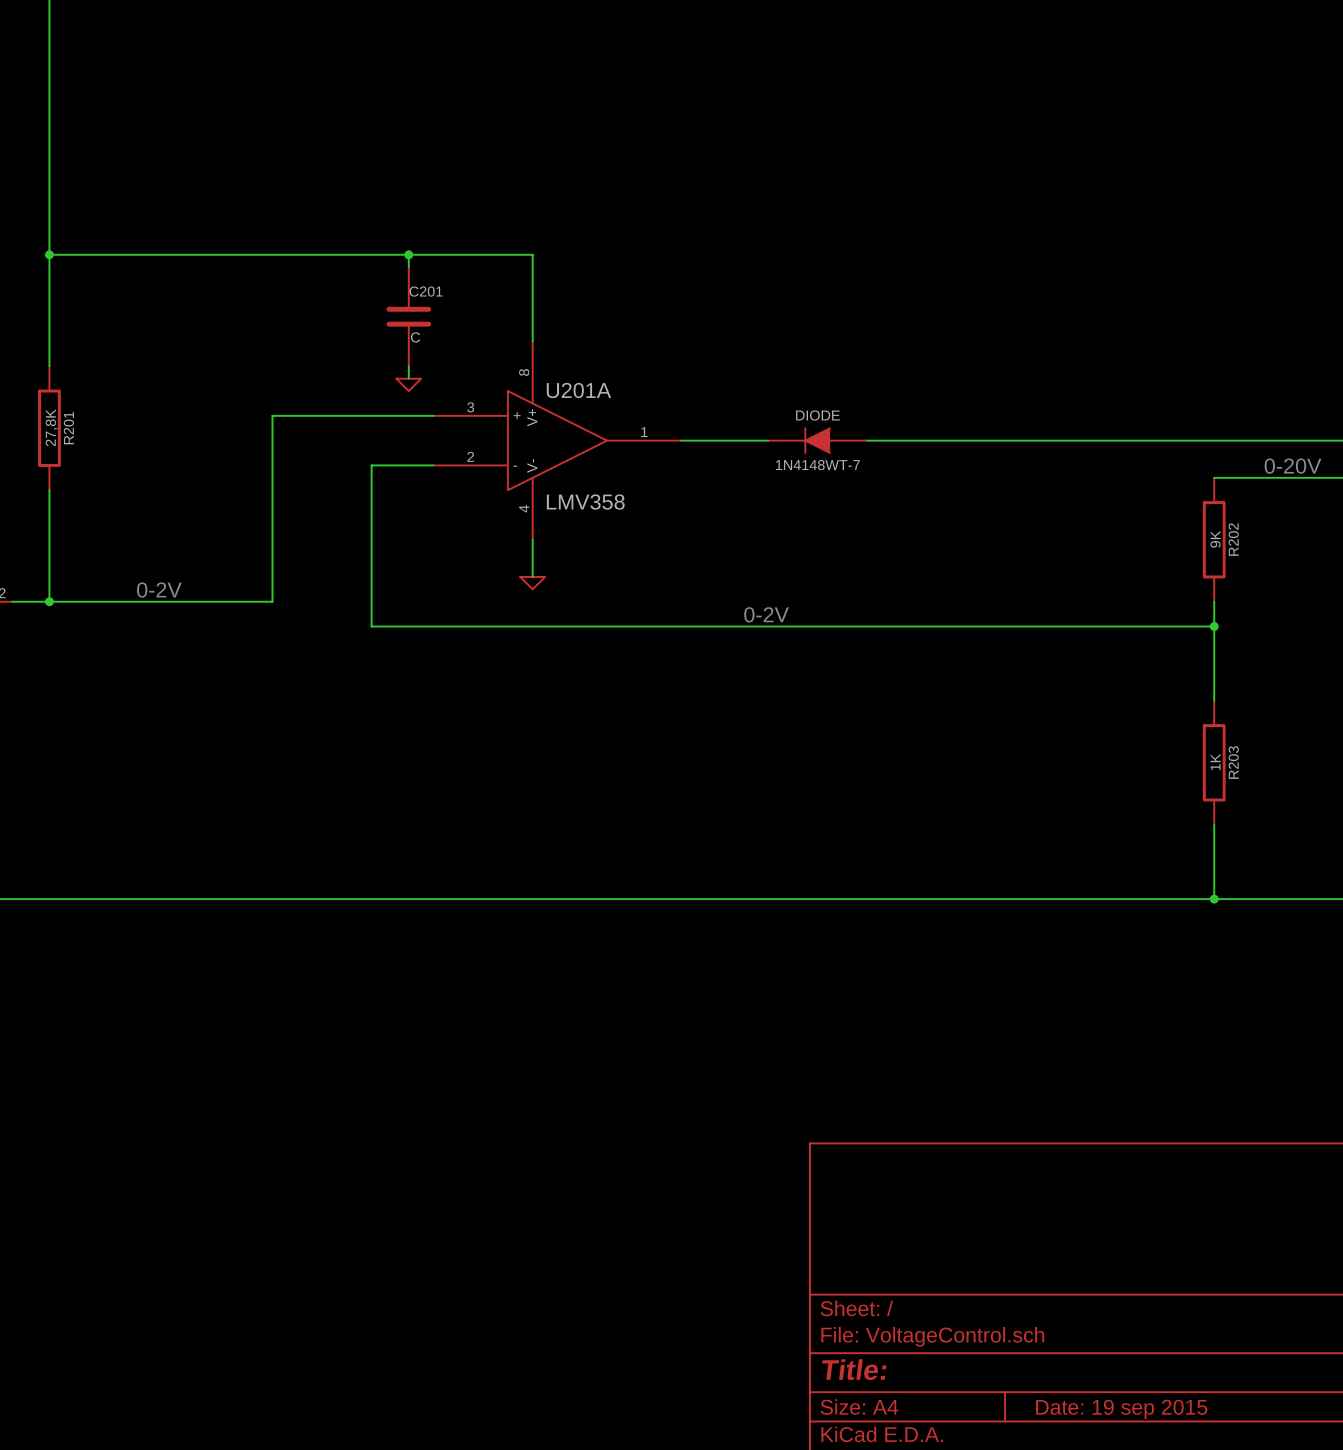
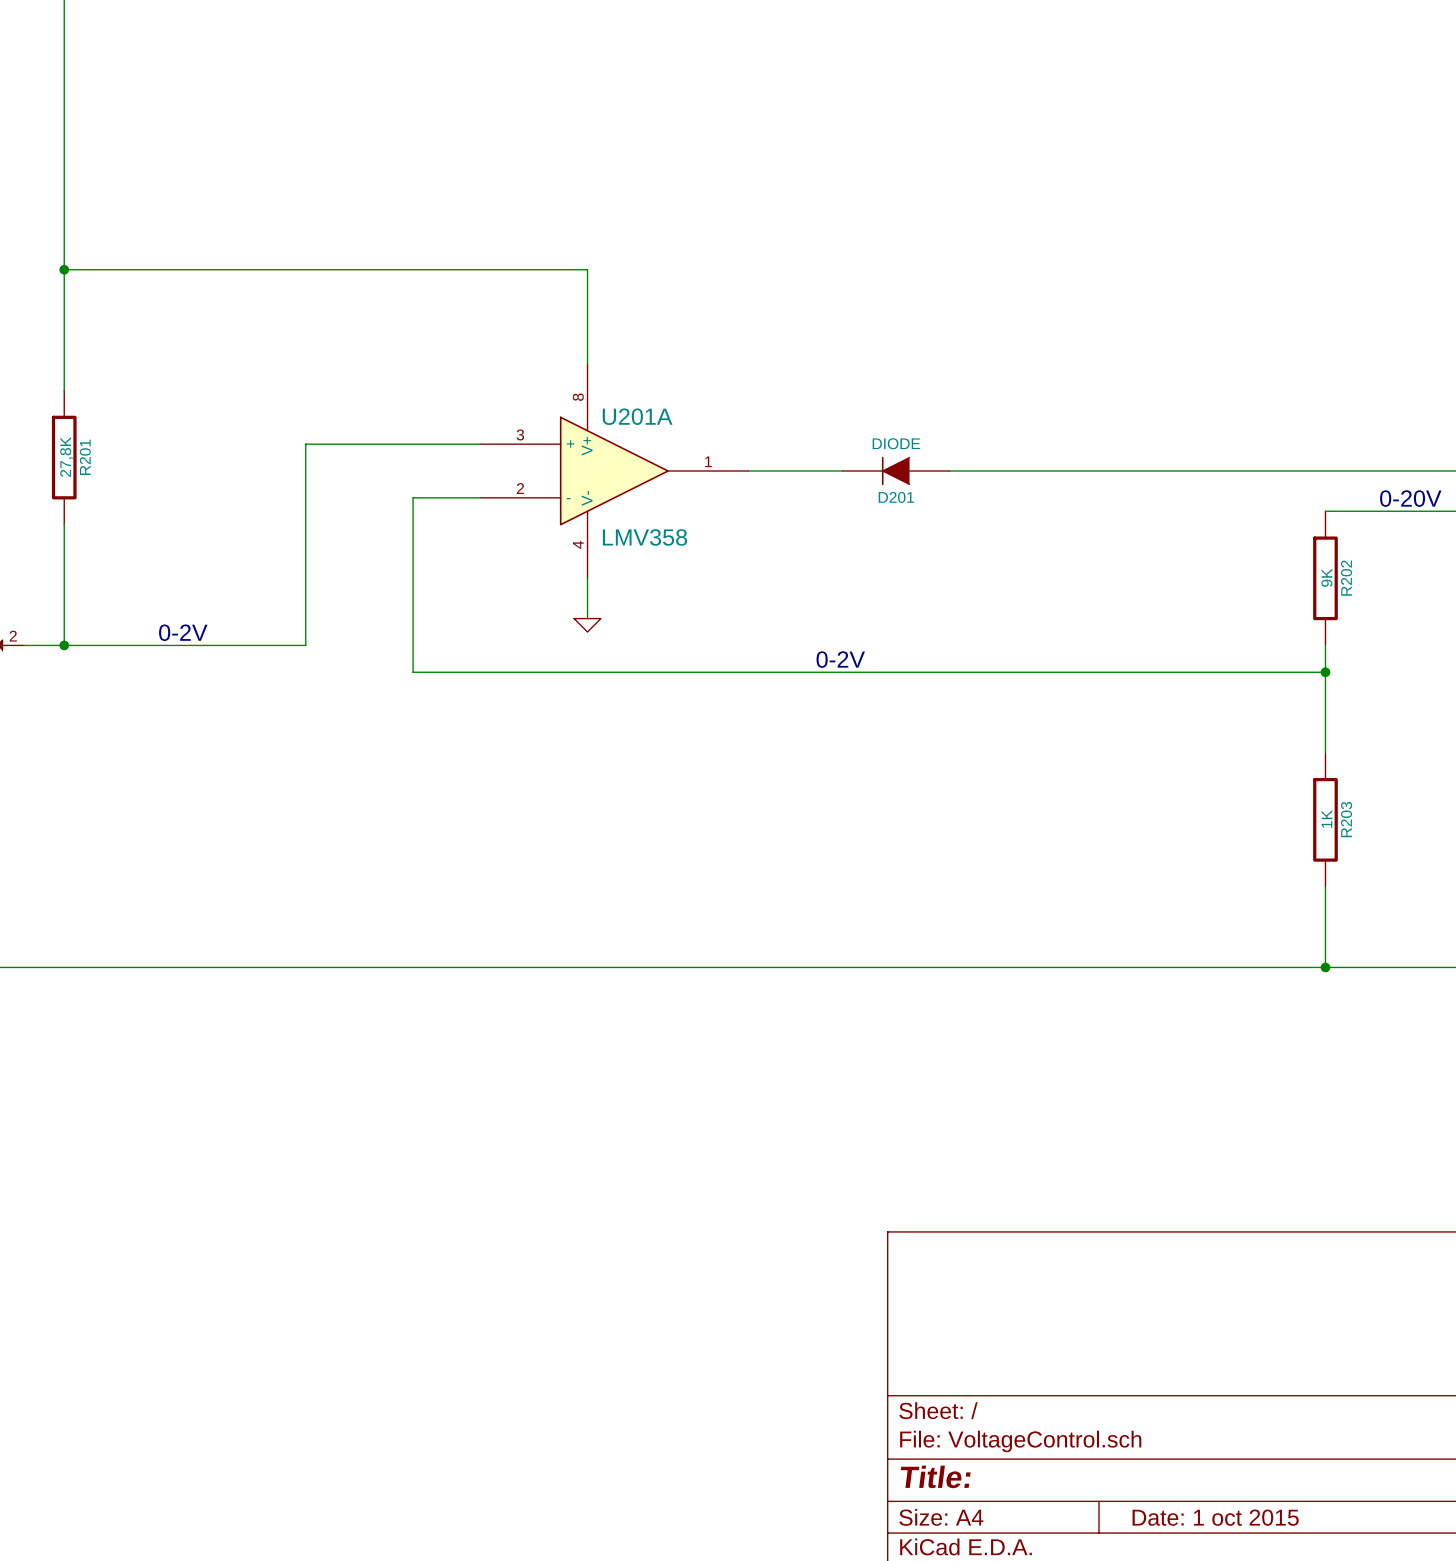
wire: (408, 254) (408, 267) -> none
junction: (408, 254) -> none
C201: C (408, 316) -> none
wire: (408, 366) (408, 378) -> none
power symbol: (408, 384) -> none
1N4148WT-7 name: 1N4148WT-7 (817, 465) -> D201 (896, 497)
title block: Date: 19 sep 2015 (1121, 1409) -> Date: 1 oct 2015 (1215, 1517)

